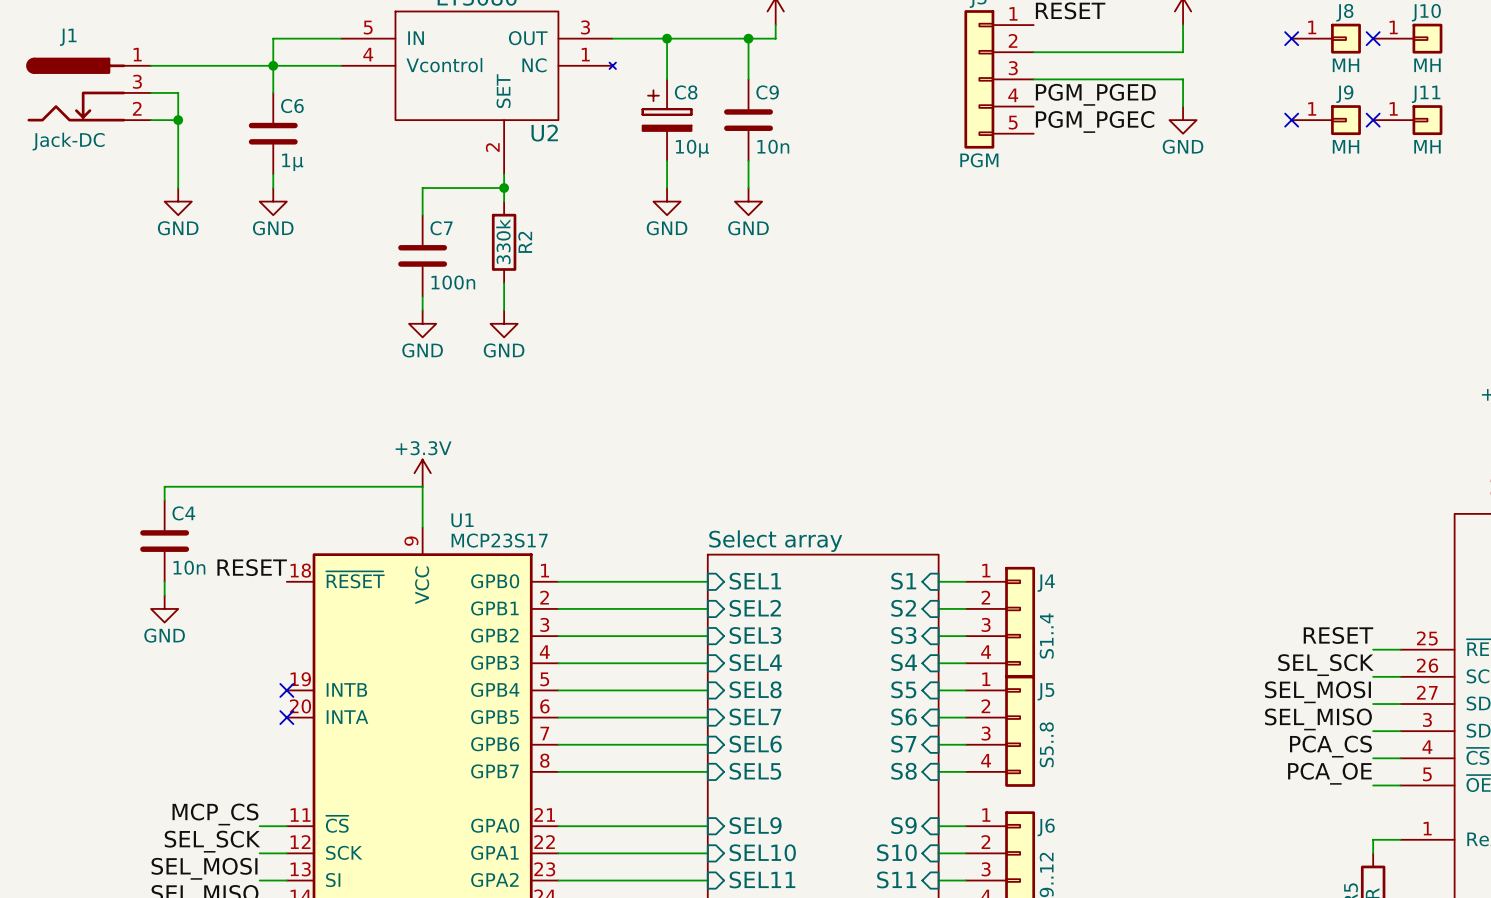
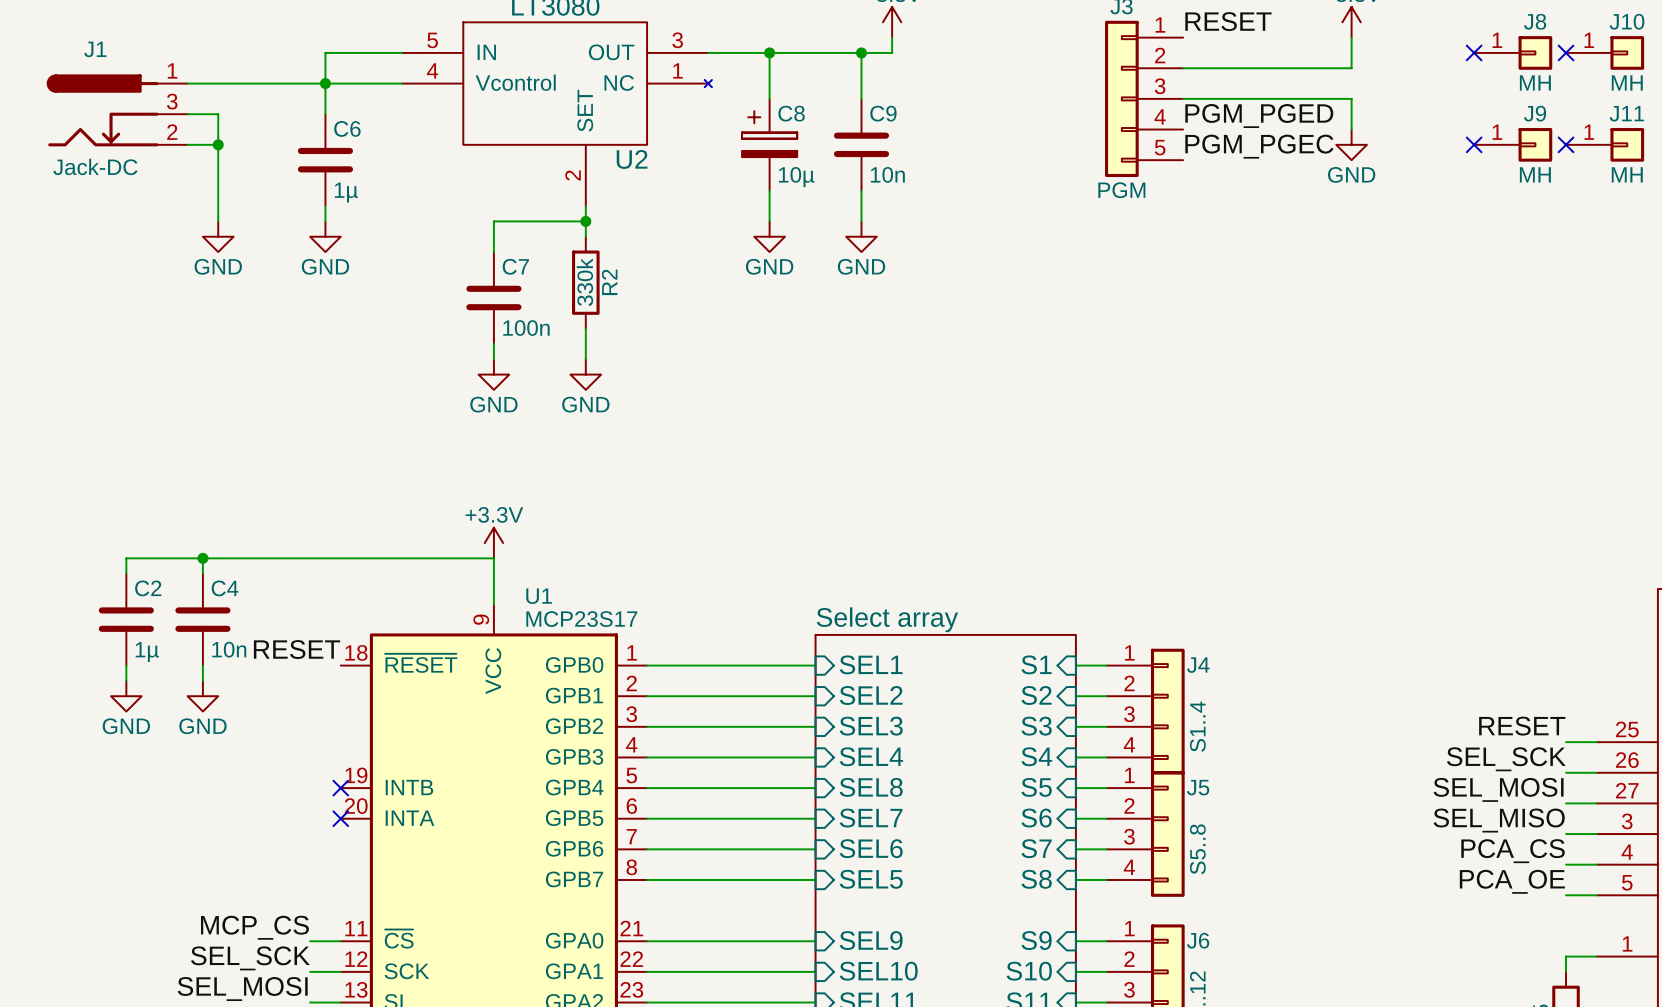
wire: none -> (202, 558) (126, 558) (126, 573)
junction: none -> (202, 558)
C2: none -> 1µ (126, 619)
wire: none -> (126, 665) (126, 680)
power symbol: none -> GND (126, 696)

